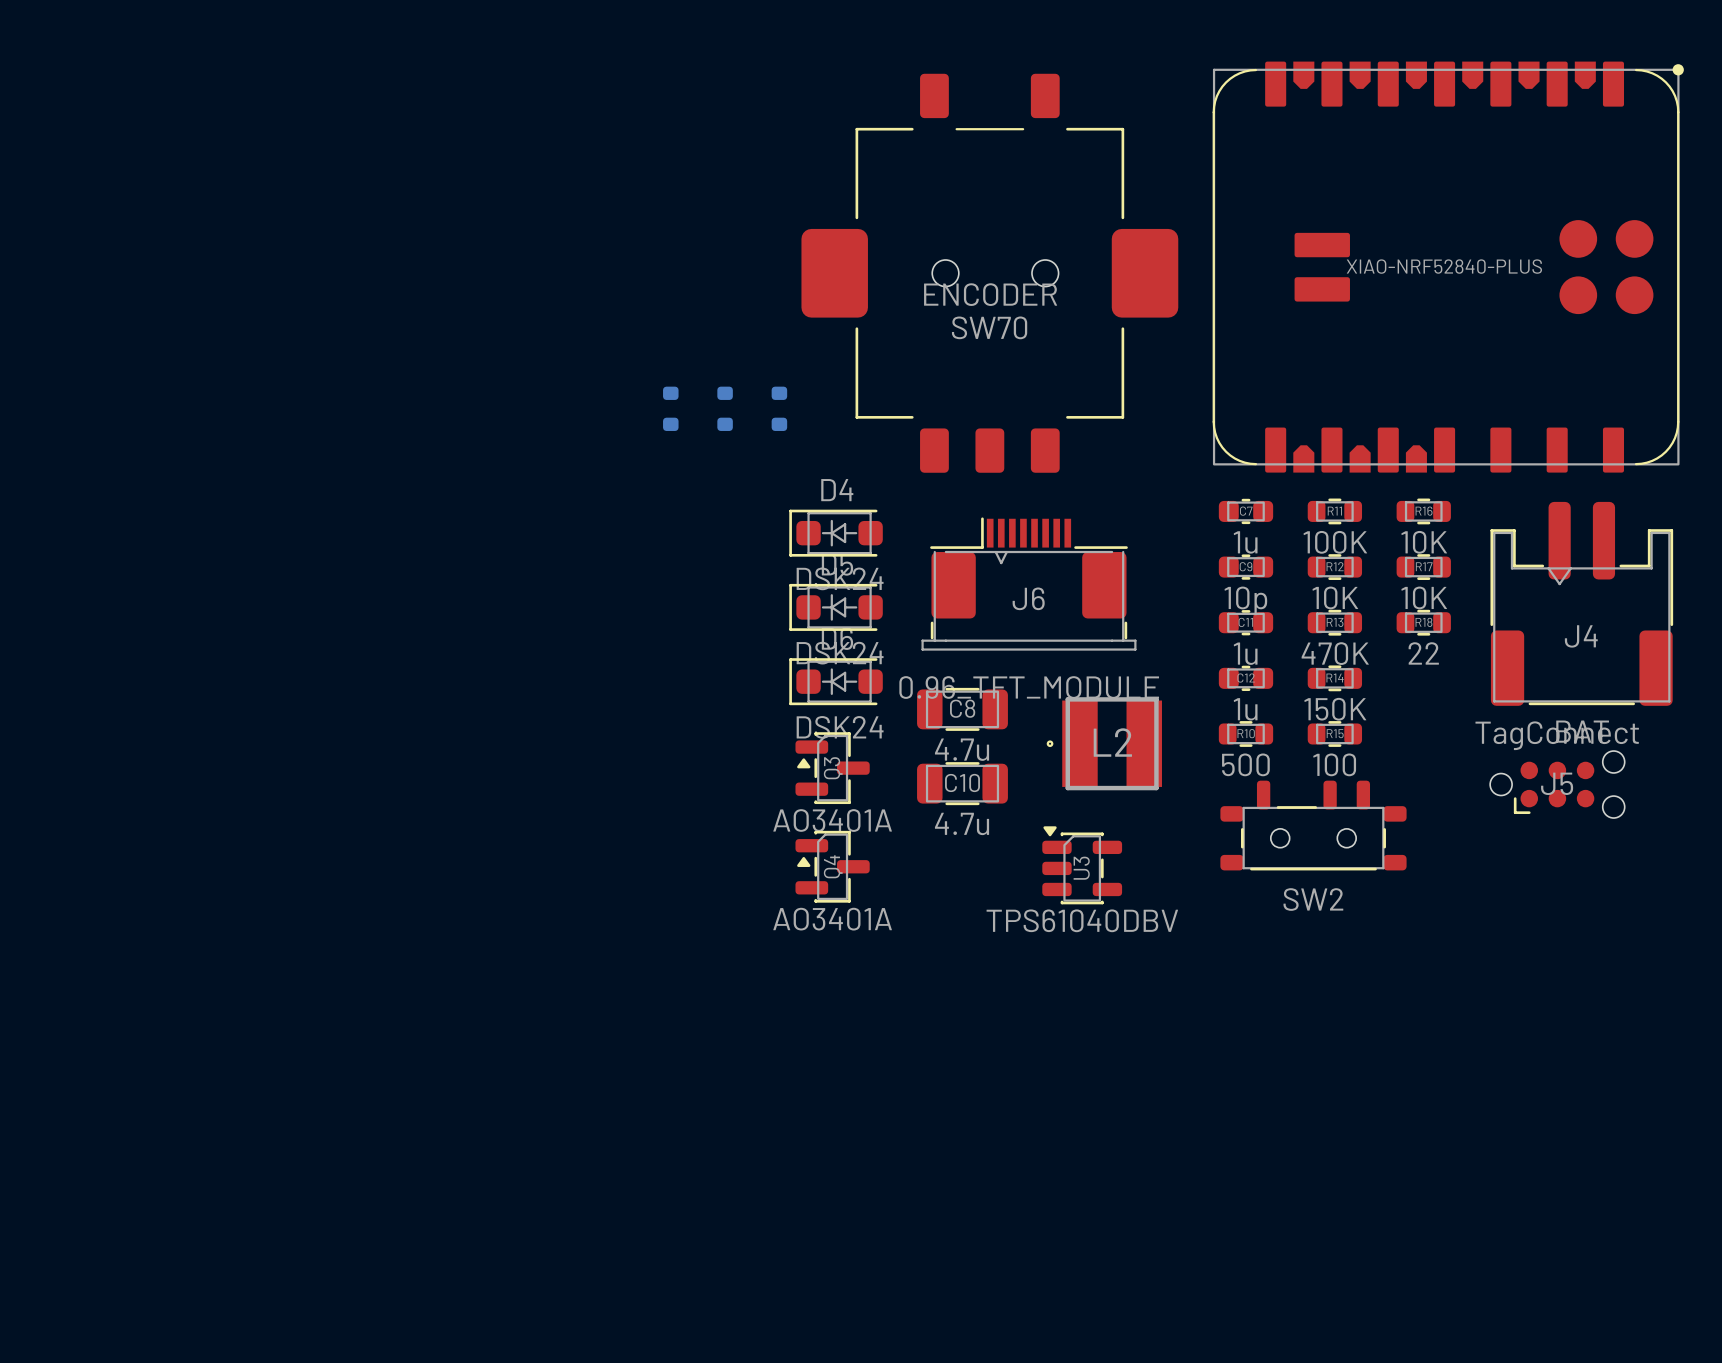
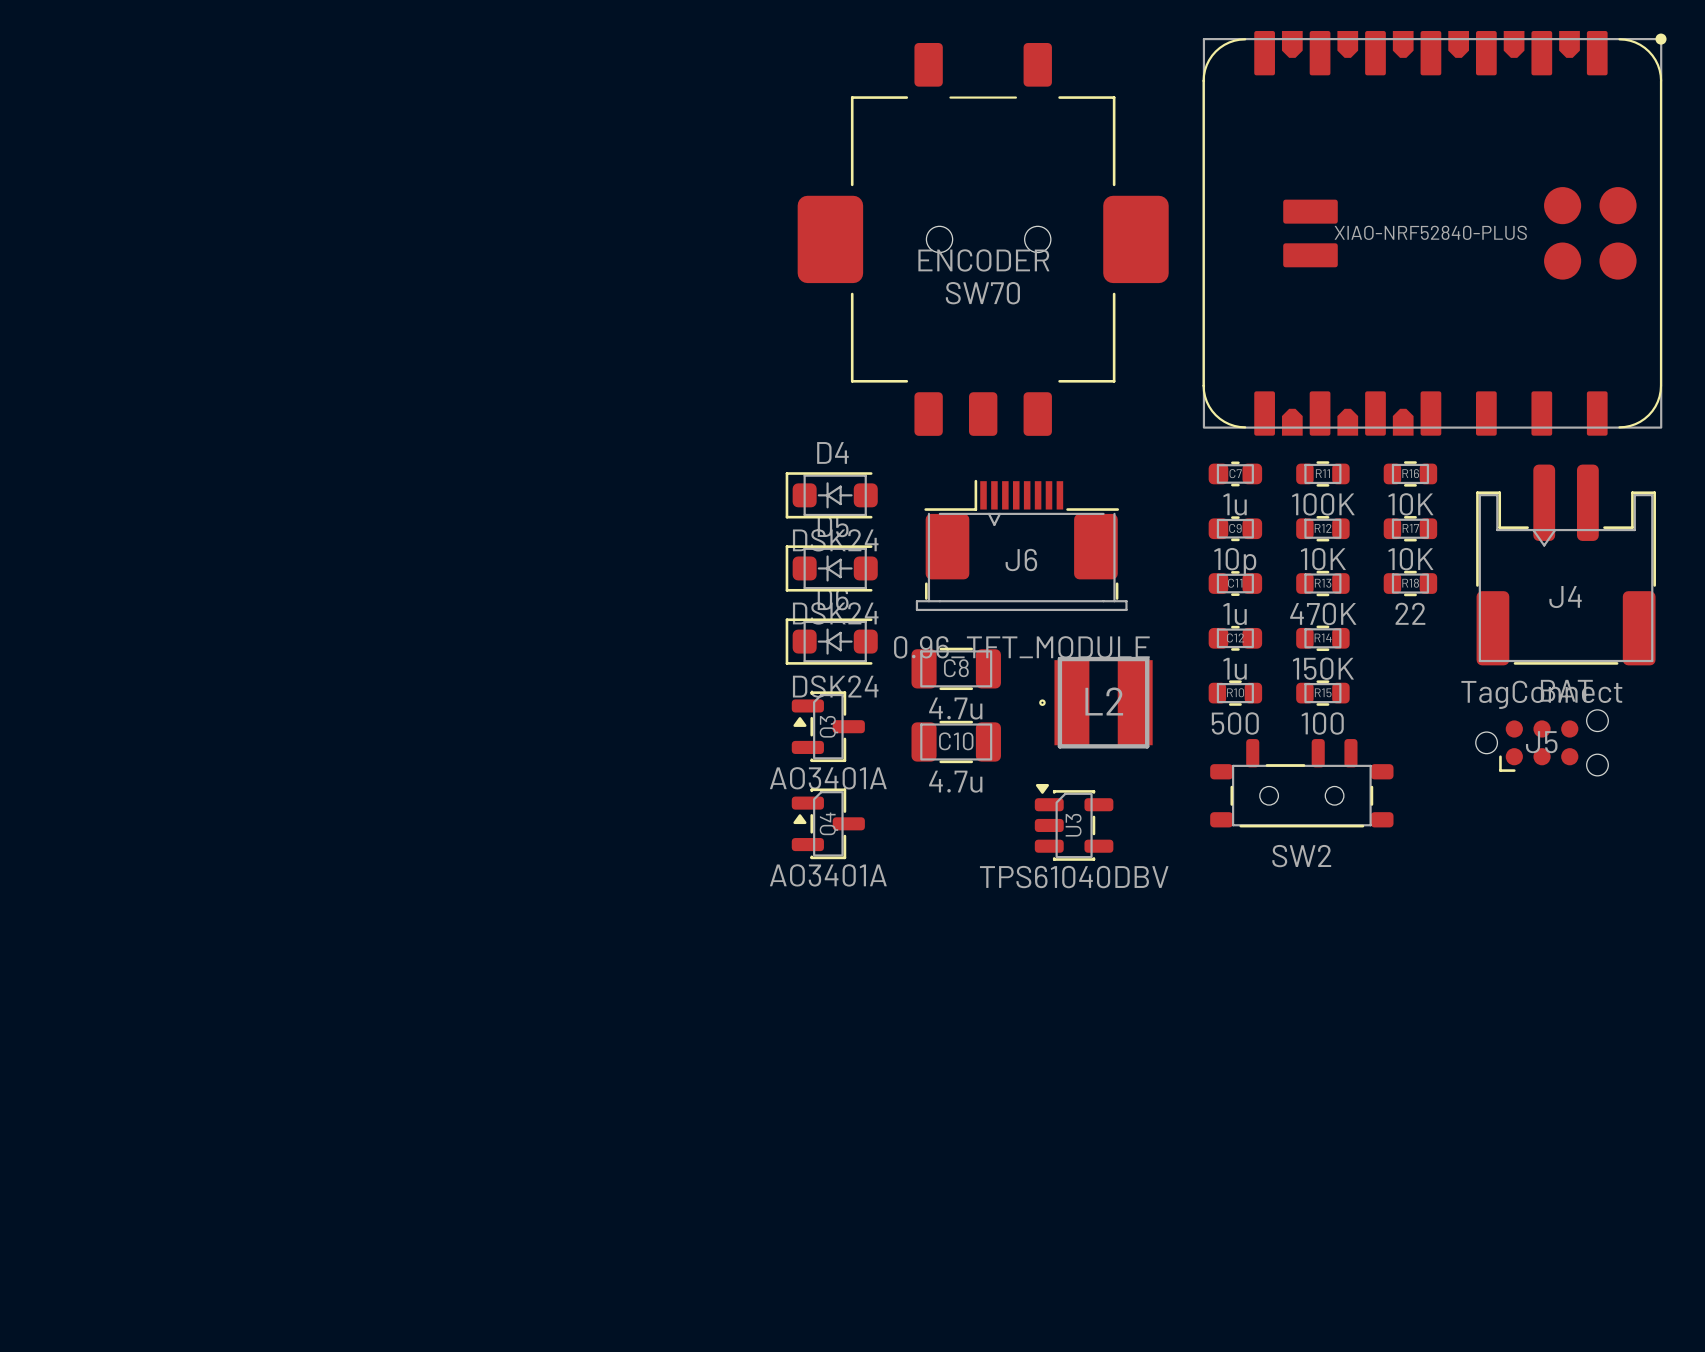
part: (670, 408) -> none
part: (725, 408) -> none
part: (779, 408) -> none

